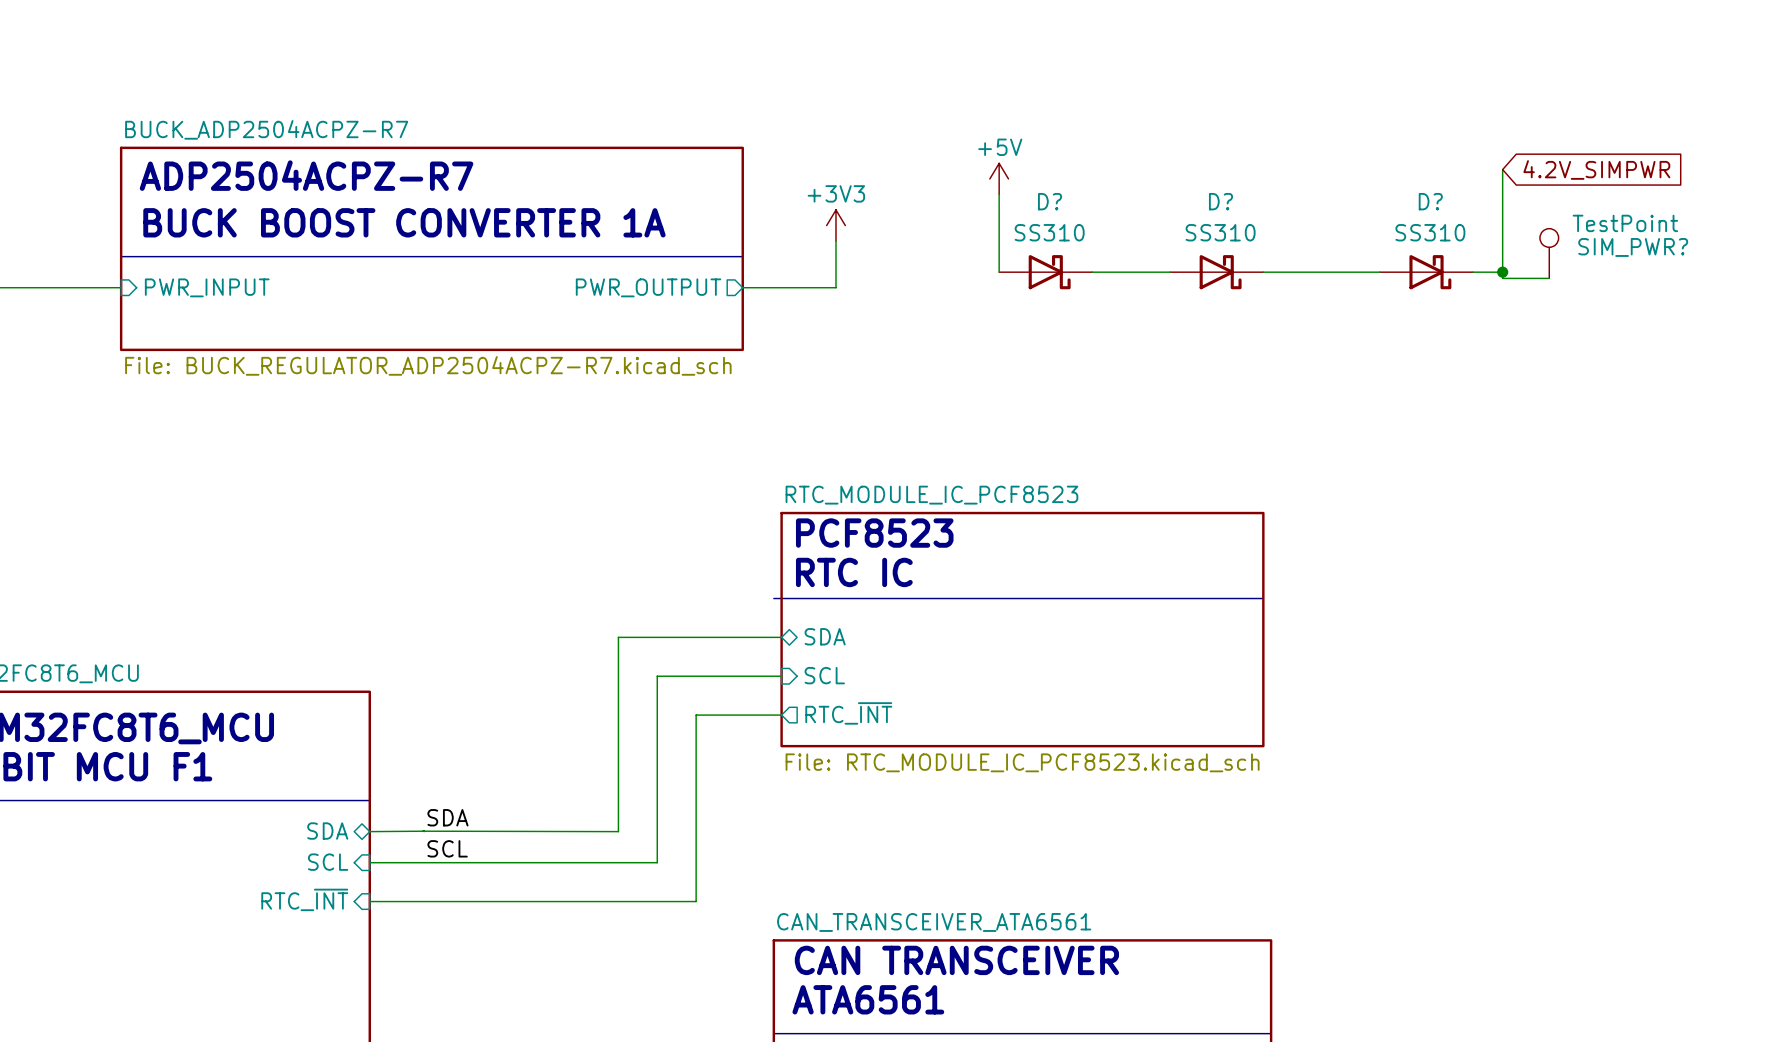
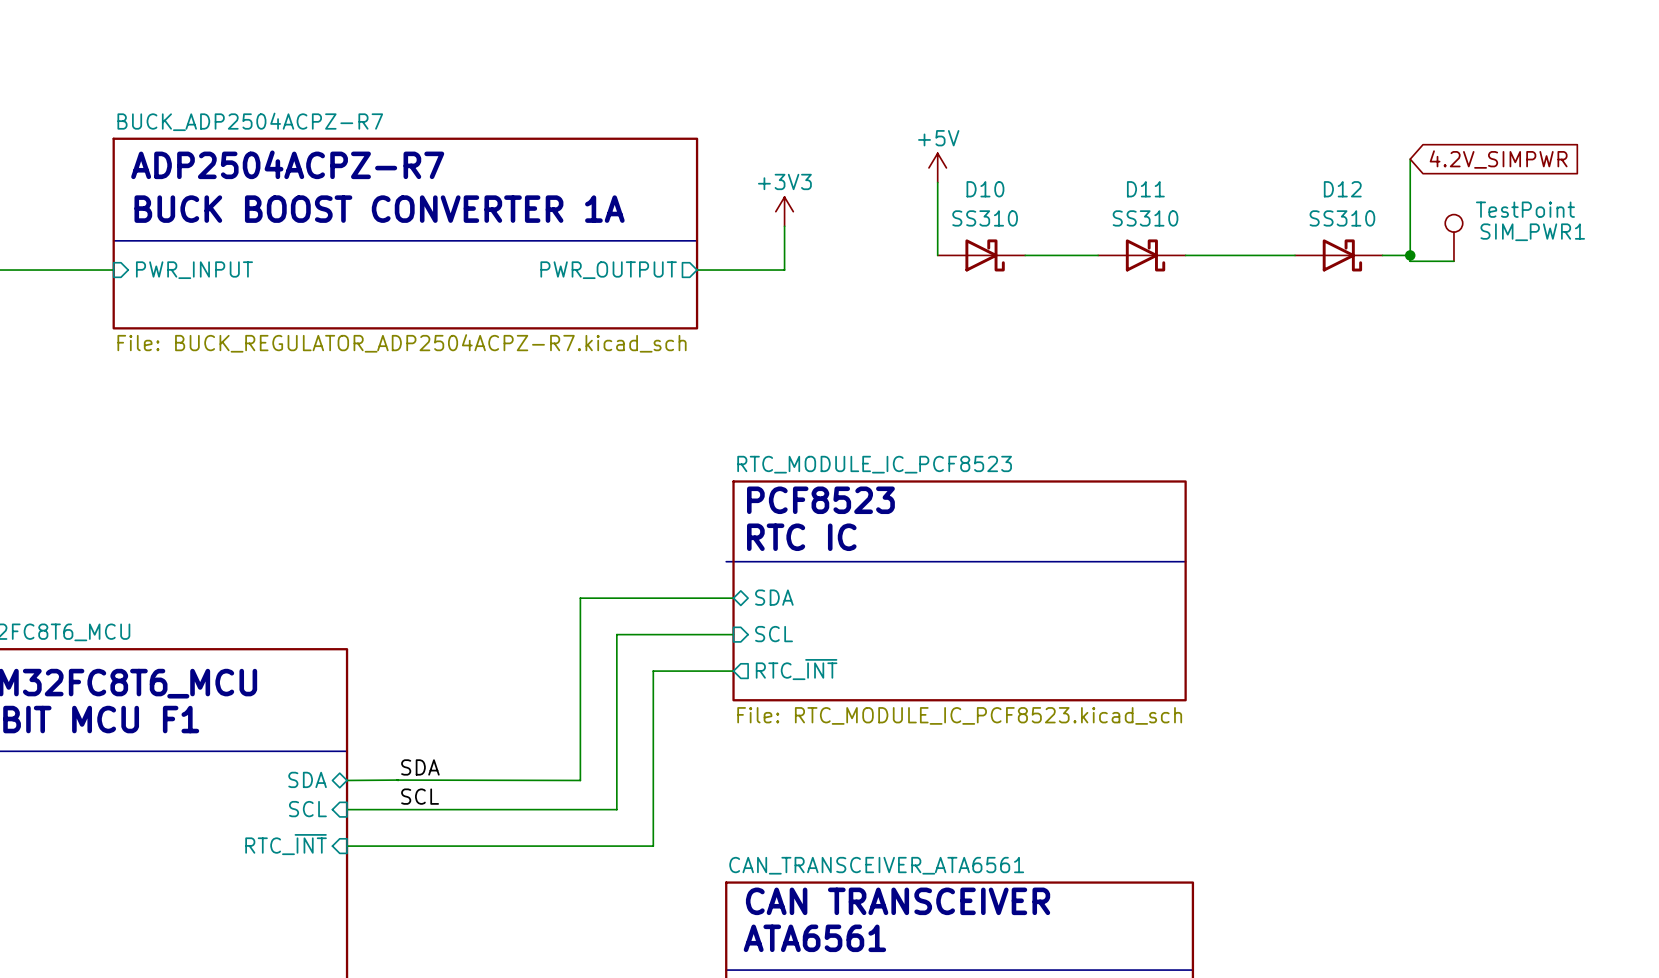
D? name: D? (1050, 201) -> D10 (985, 189)
D? name: D? (1220, 201) -> D11 (1145, 189)
D? name: D? (1430, 201) -> D12 (1342, 189)
SIM_PWR? name: SIM_PWR? (1633, 247) -> SIM_PWR1 (1532, 232)

